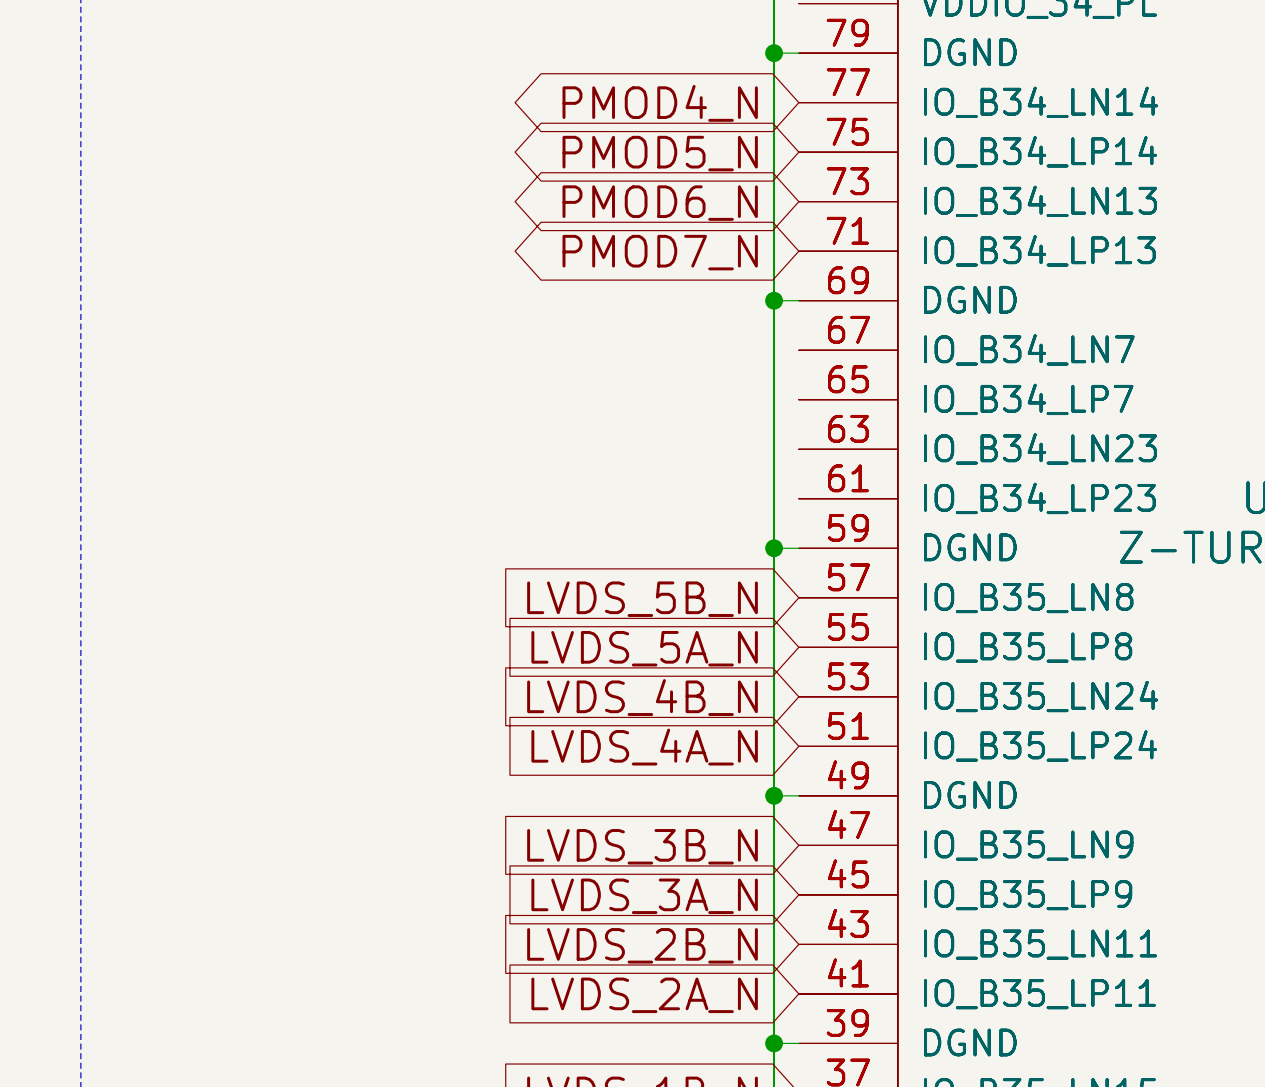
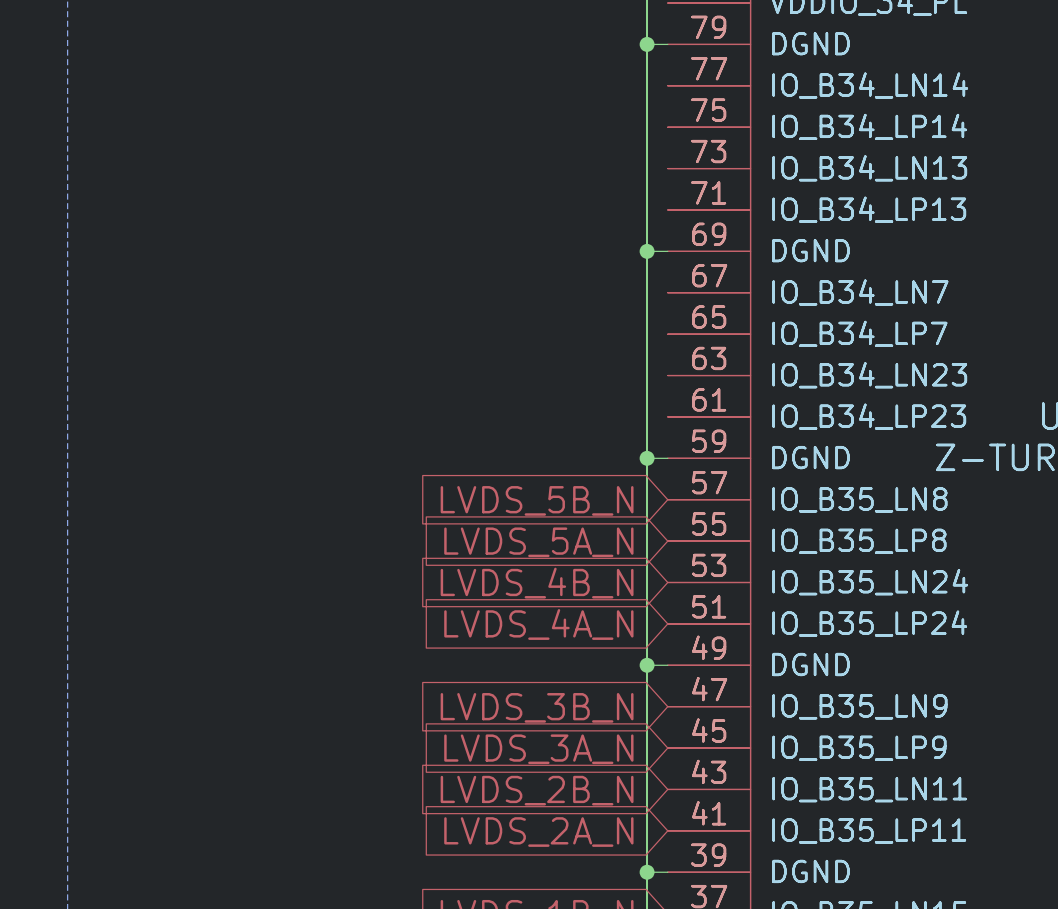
global label: PMOD4_N (660, 103) -> none
global label: PMOD5_N (660, 153) -> none
global label: PMOD6_N (660, 203) -> none
global label: PMOD7_N (660, 252) -> none

